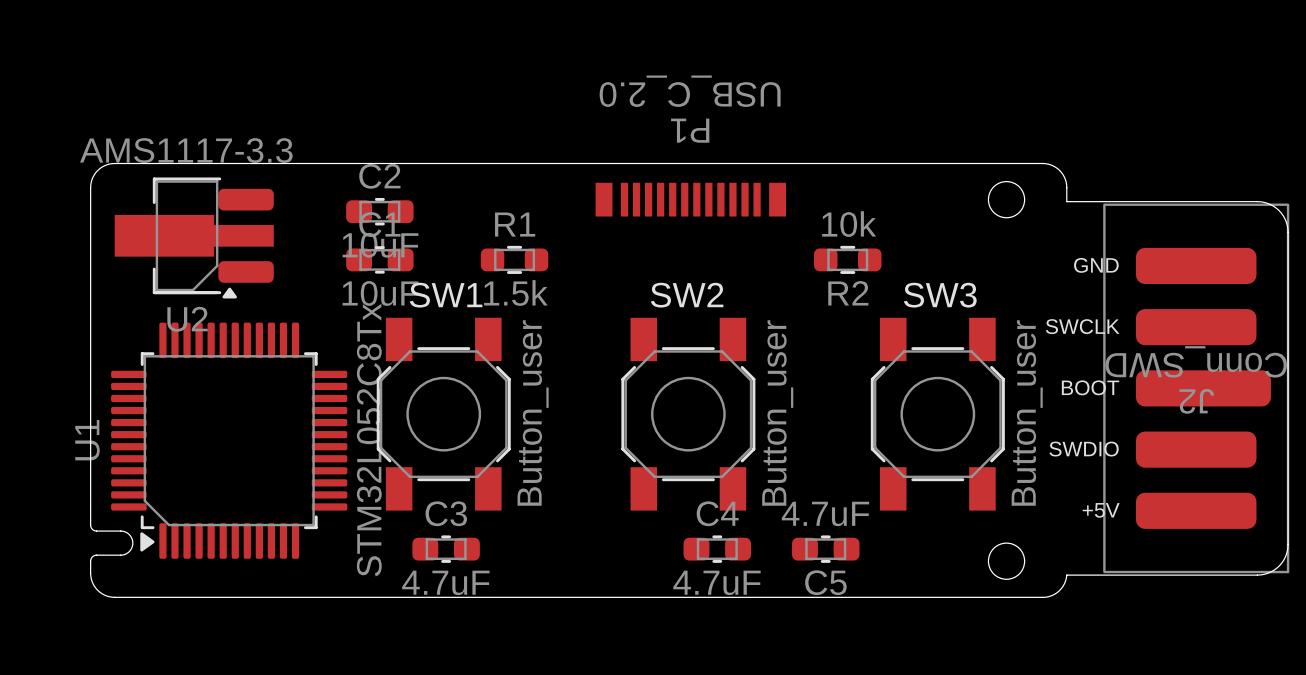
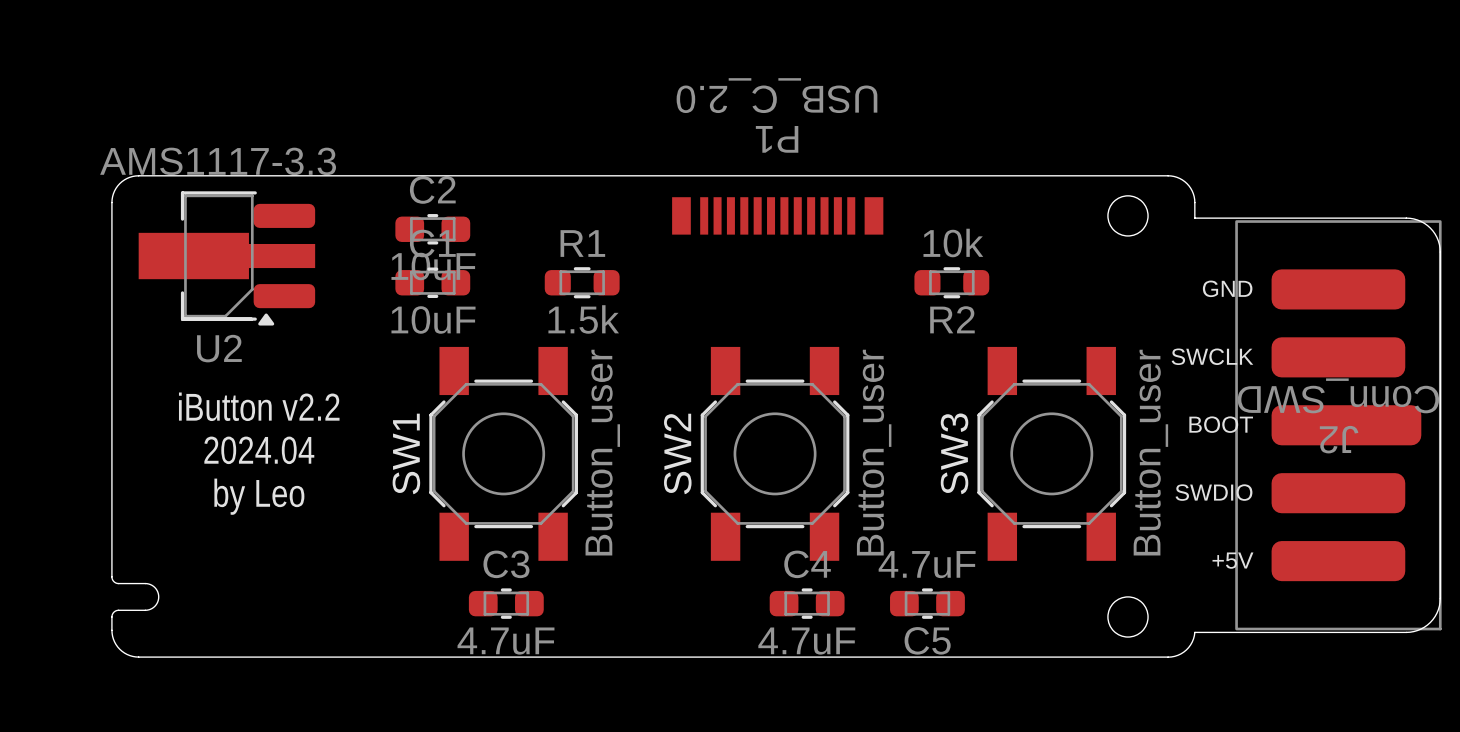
SW1 name rotation: 0° (446, 295) -> 90° counterclockwise (406, 453)
SW1 name position: SW1 (446, 295) -> SW1 (406, 453)
SW2 name rotation: 0° (687, 295) -> 90° counterclockwise (677, 453)
SW2 name position: SW2 (687, 295) -> SW2 (677, 453)
SW3 name rotation: 0° (940, 295) -> 90° counterclockwise (954, 453)
SW3 name position: SW3 (940, 295) -> SW3 (954, 453)
text: none -> iButton v2.2 (259, 406)
text: none -> 2024.04 (259, 450)
U1: STM32L052C8Tx (229, 440) -> none
text: none -> by Leo (259, 496)

